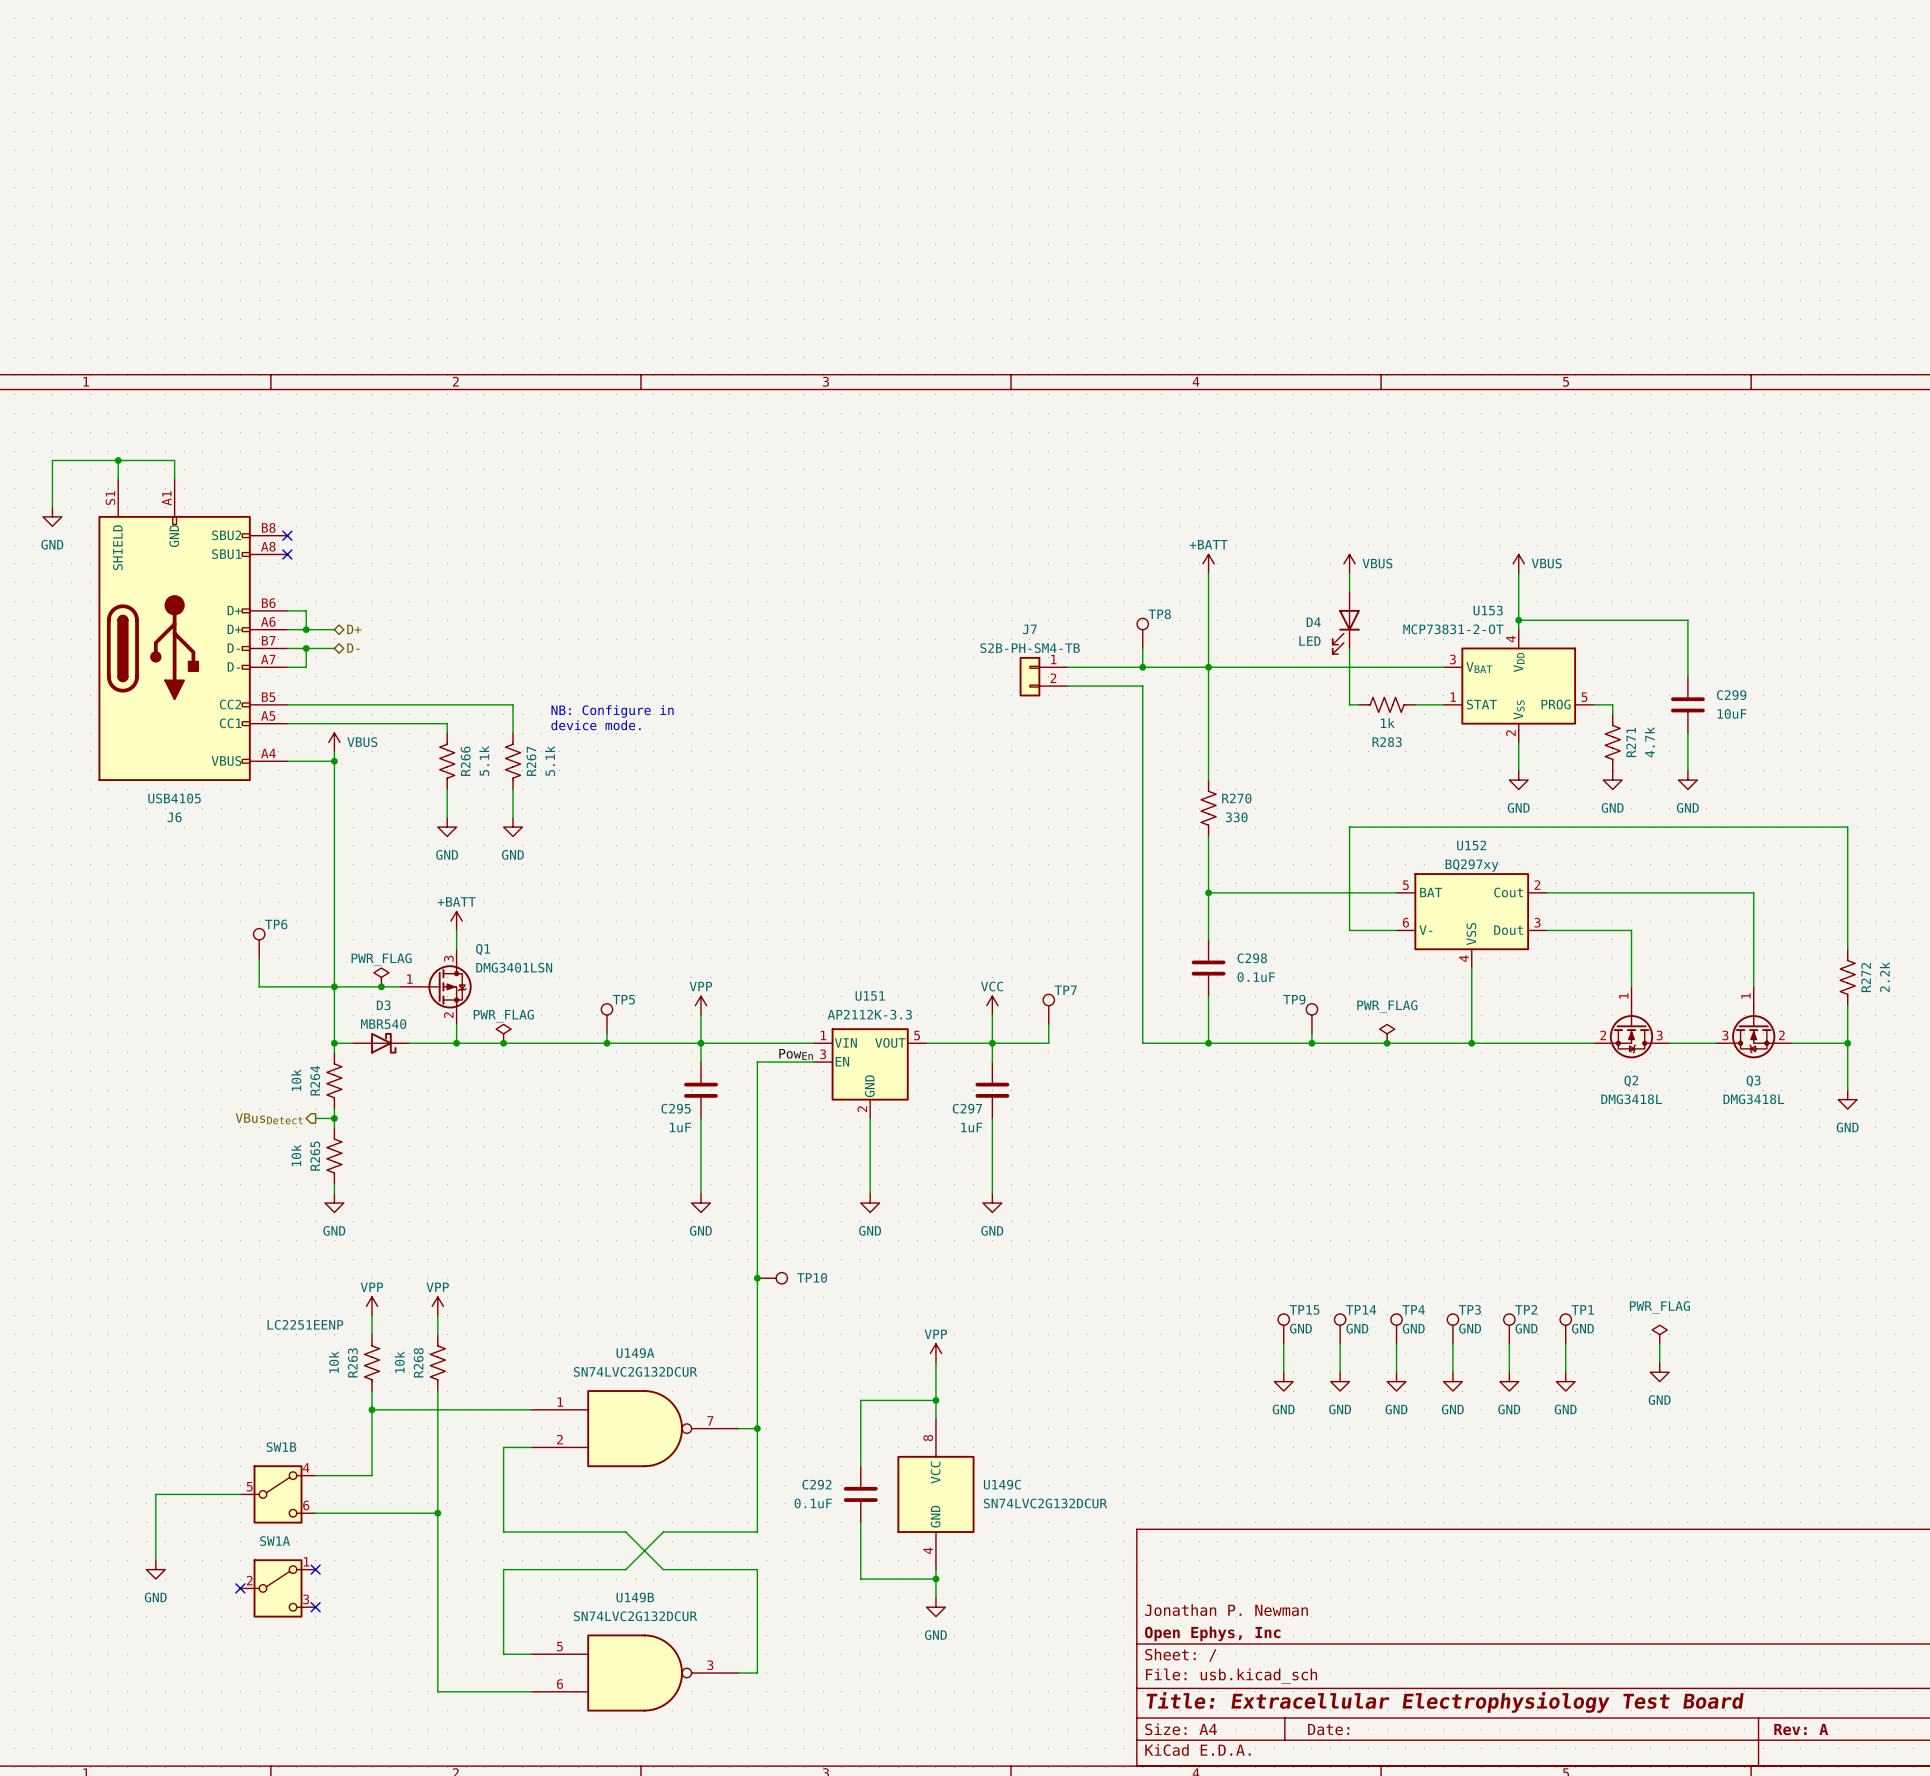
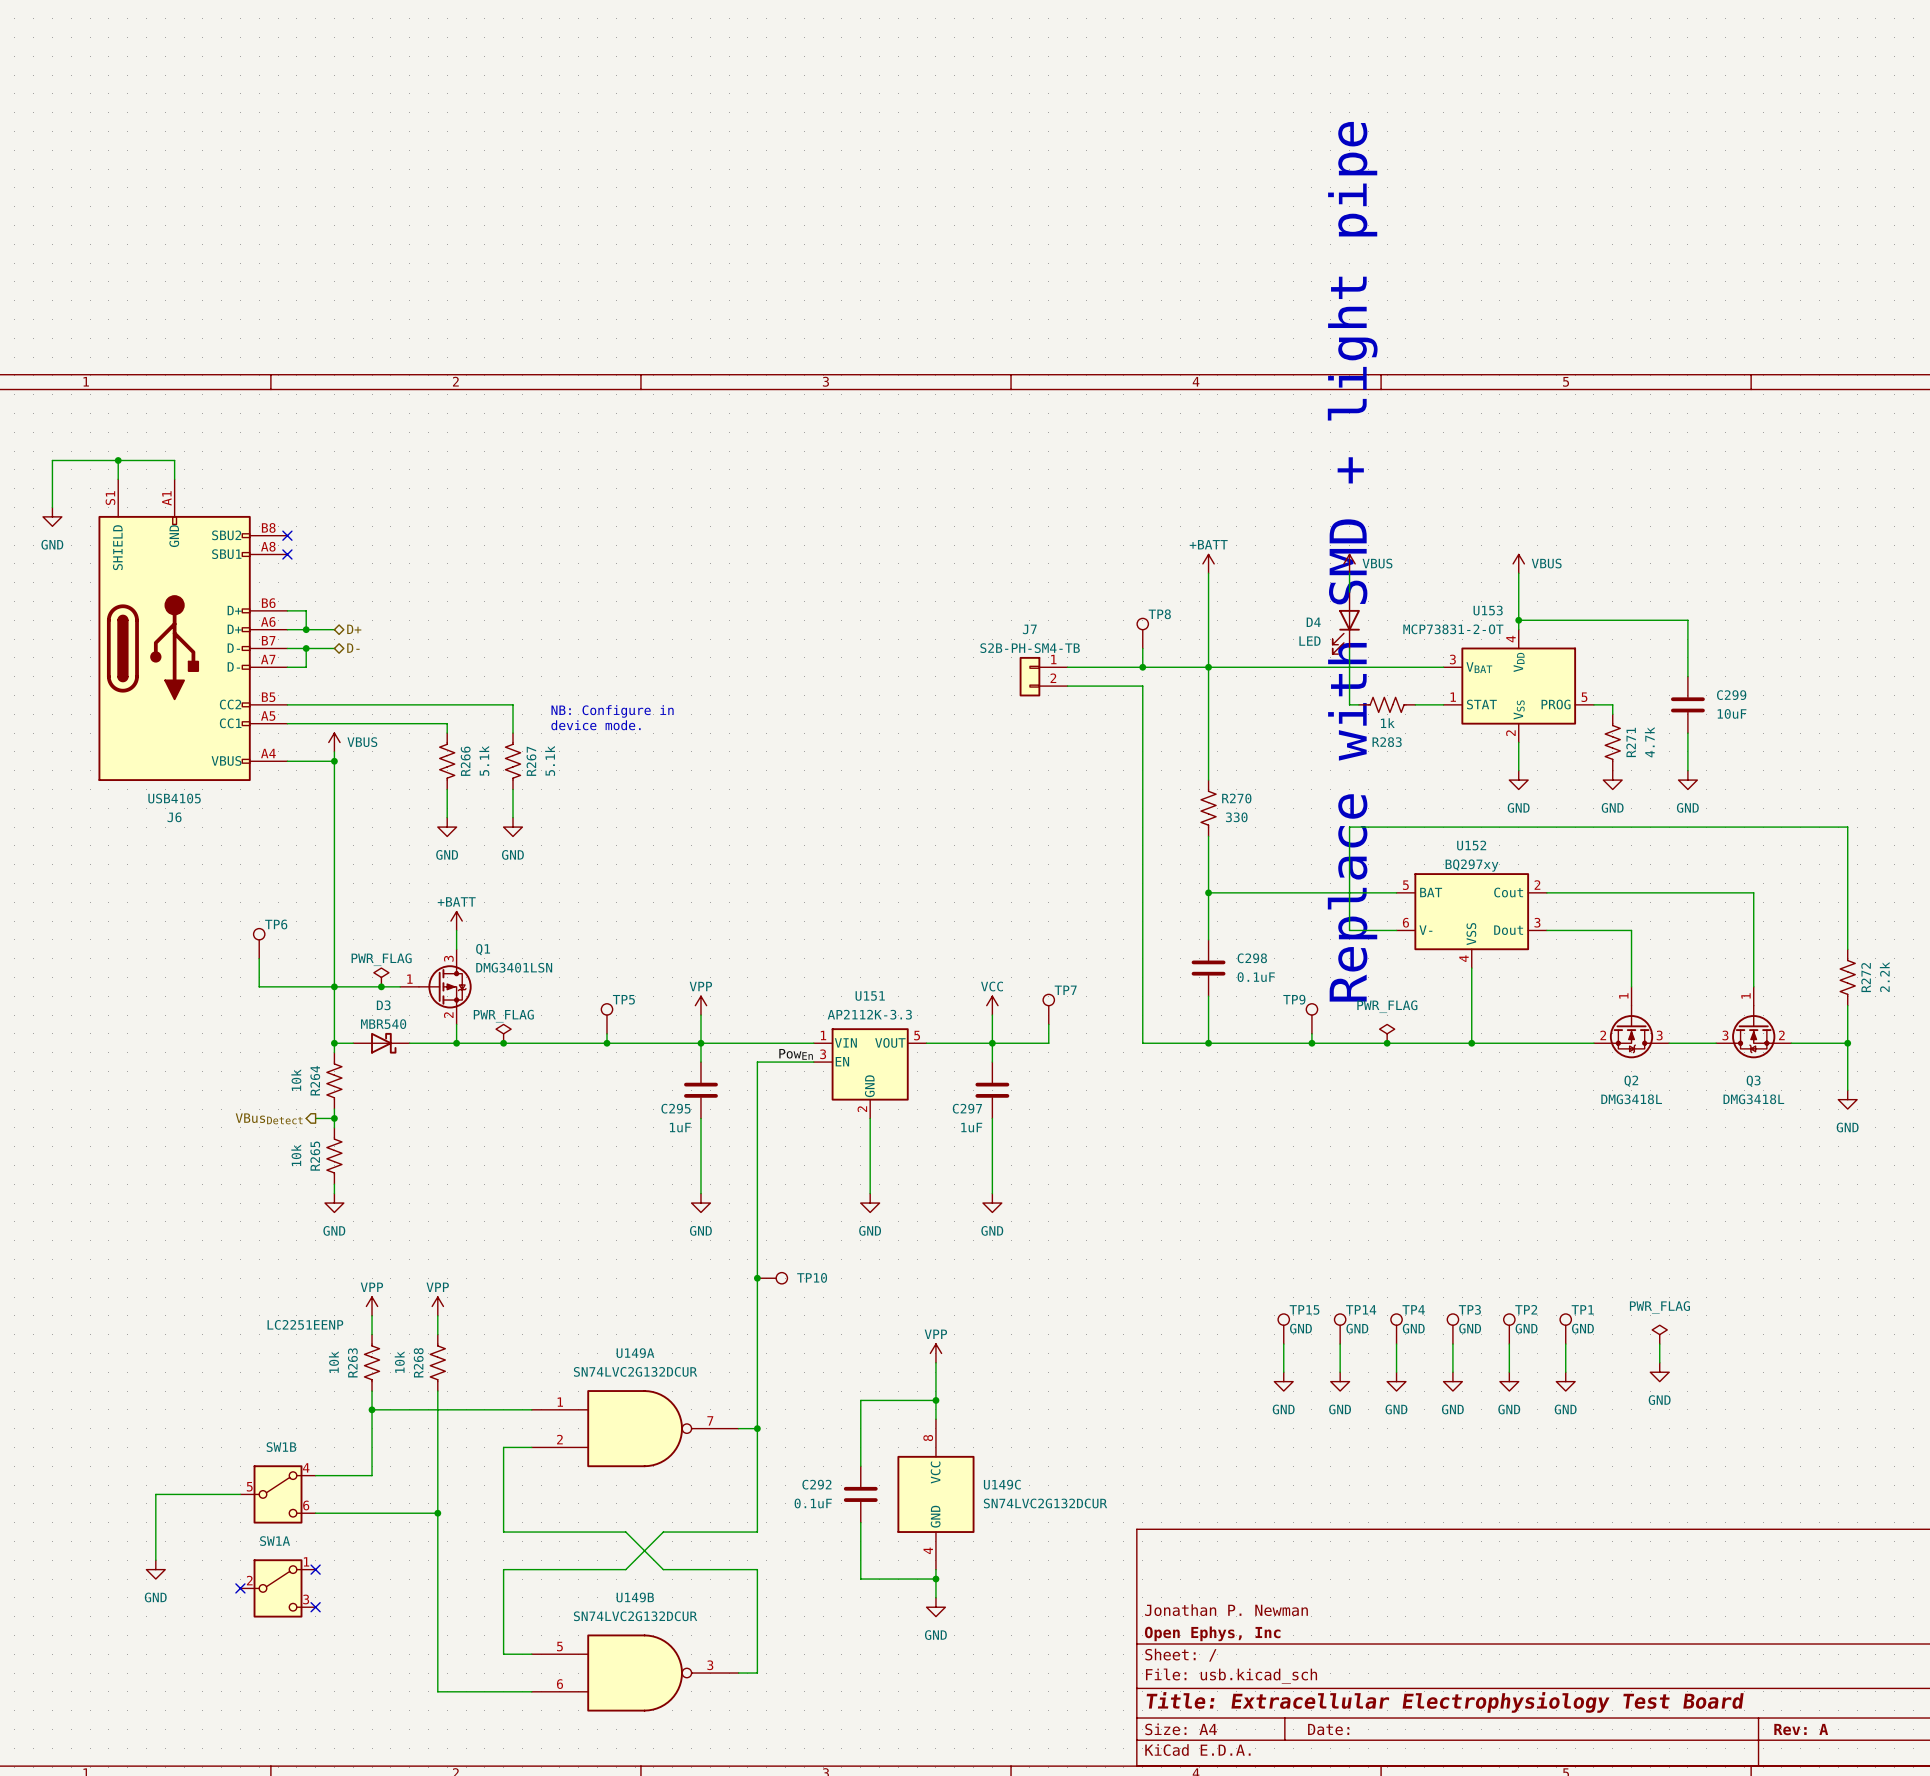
text: none -> Replace with SMD + light pipe (1352, 561)

